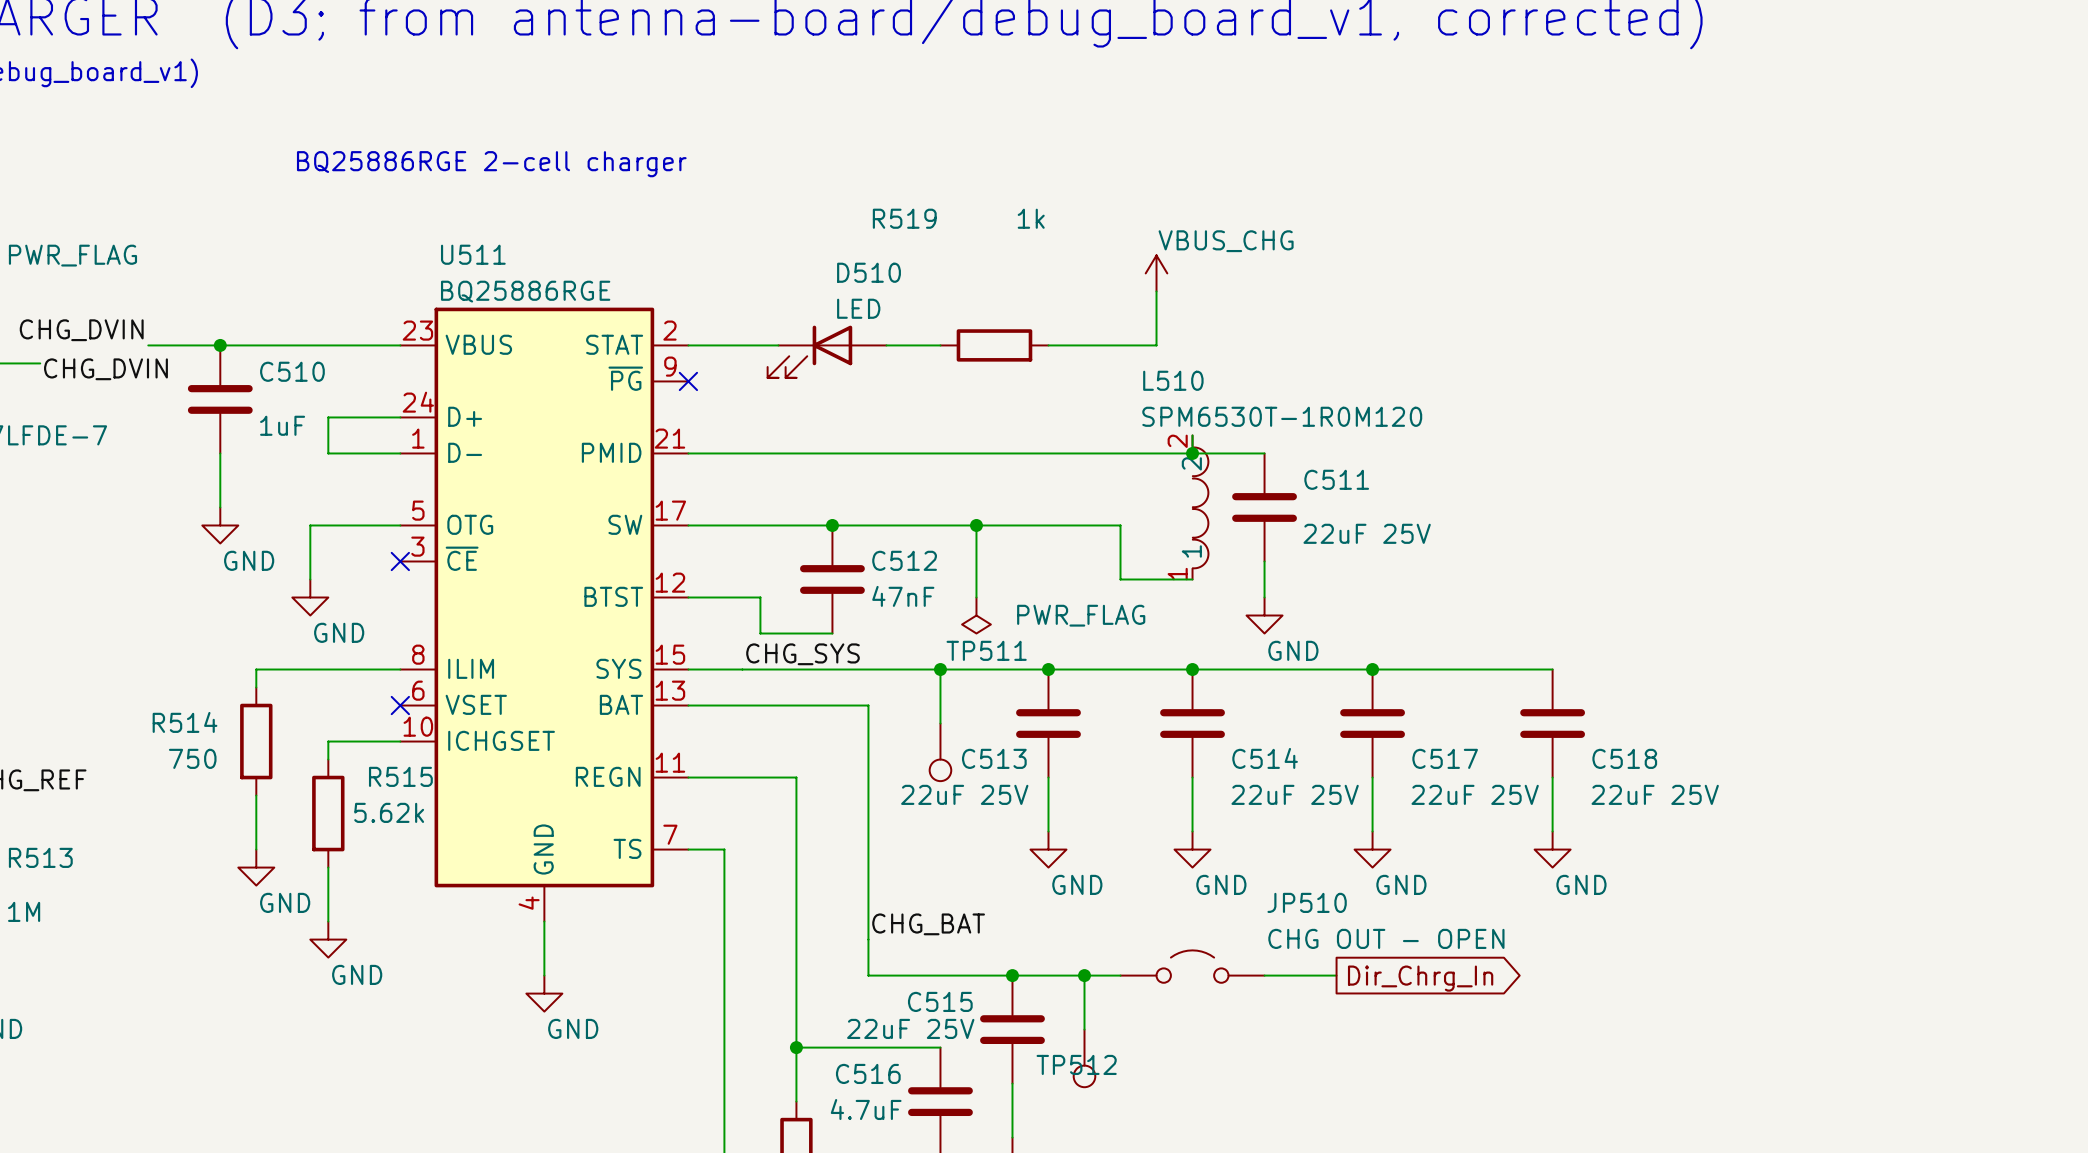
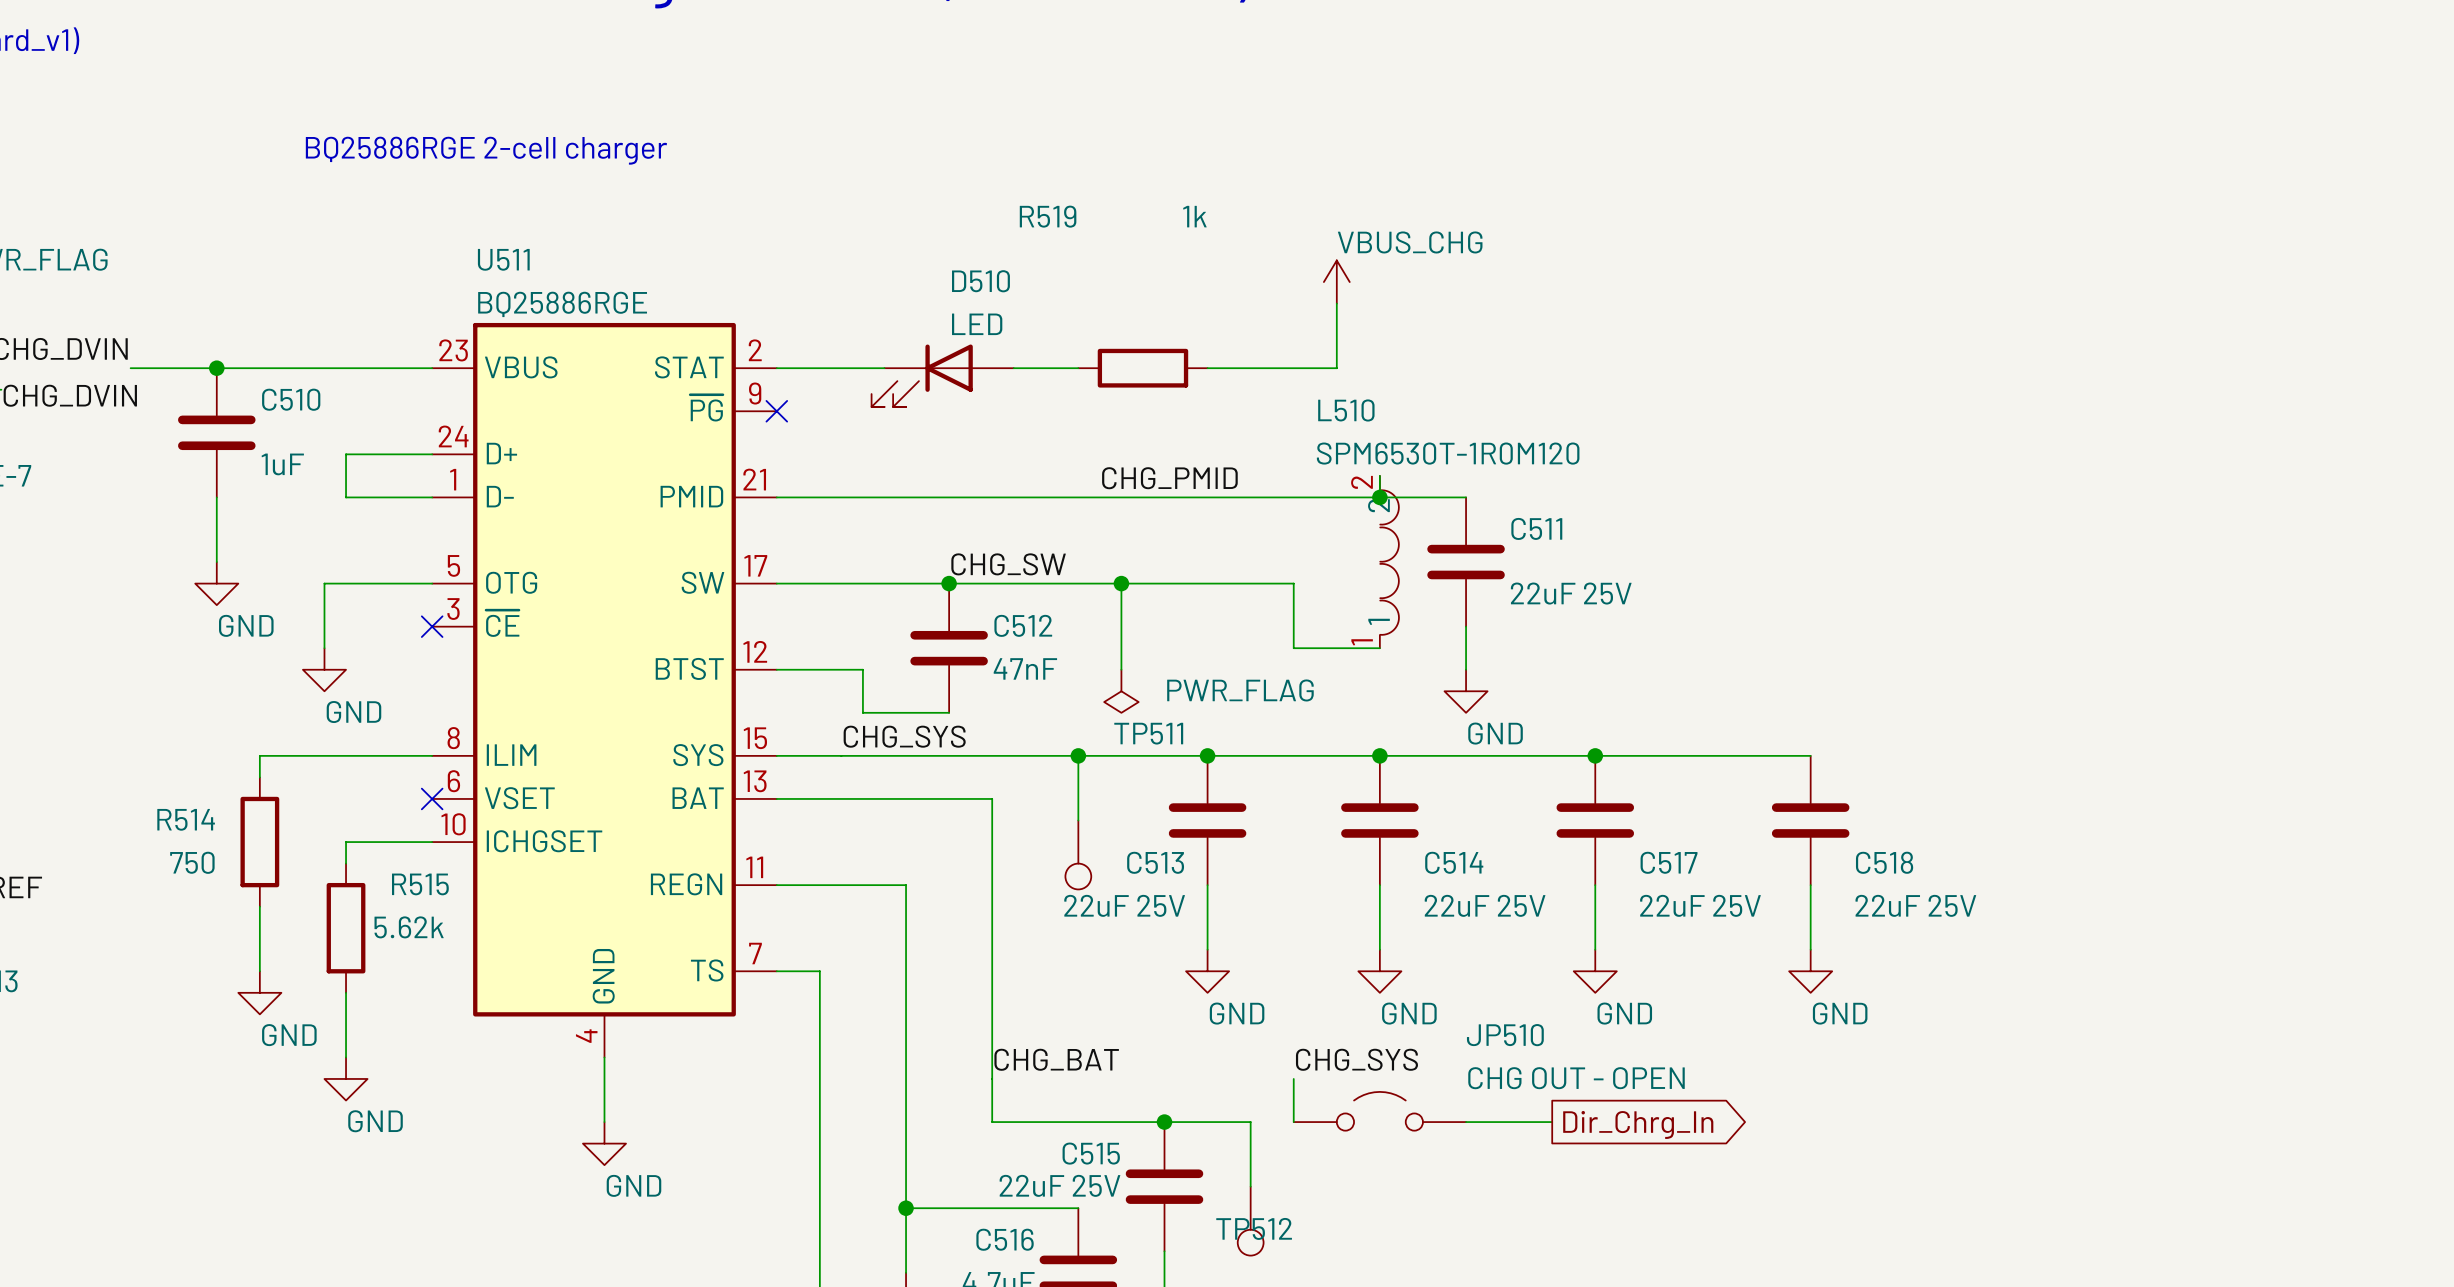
label: none -> CHG_PMID (1169, 478)
label: none -> CHG_SW (1008, 564)
label: none -> CHG_SYS (1356, 1059)
wire: (1084, 975) (1120, 975) -> (1293, 1078) (1293, 1122)
junction: (1084, 975) -> none

